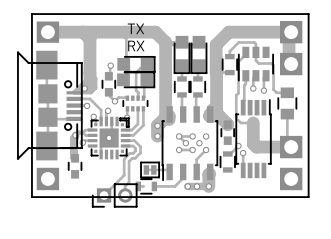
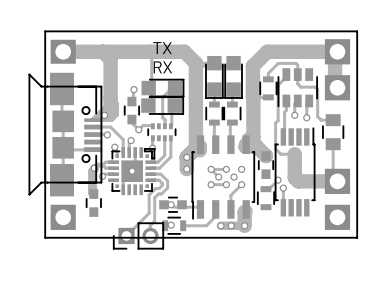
part footprint: [140, 161, 160, 179] -> [159, 196, 187, 213]
via: none -> (171, 204)
via: none -> (171, 225)

